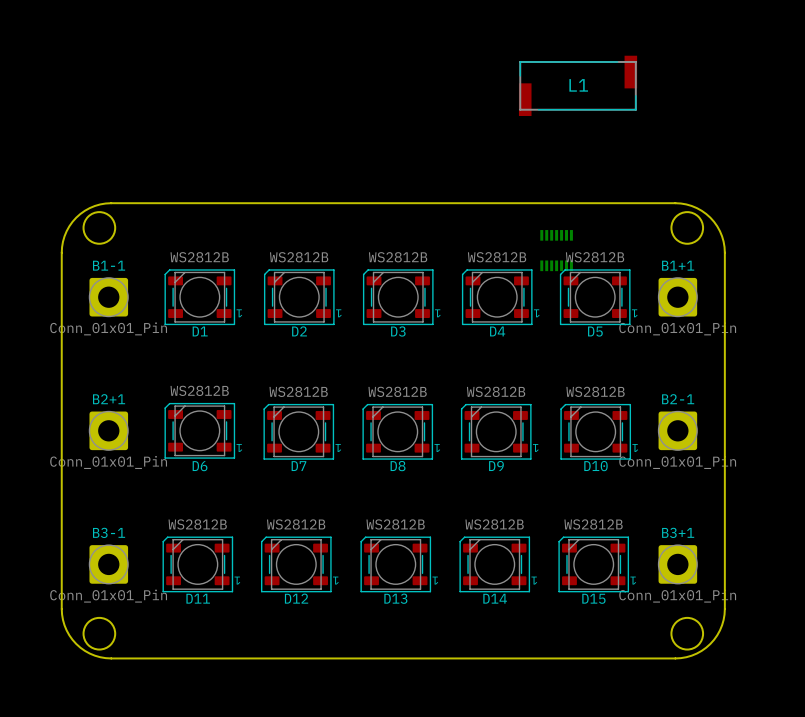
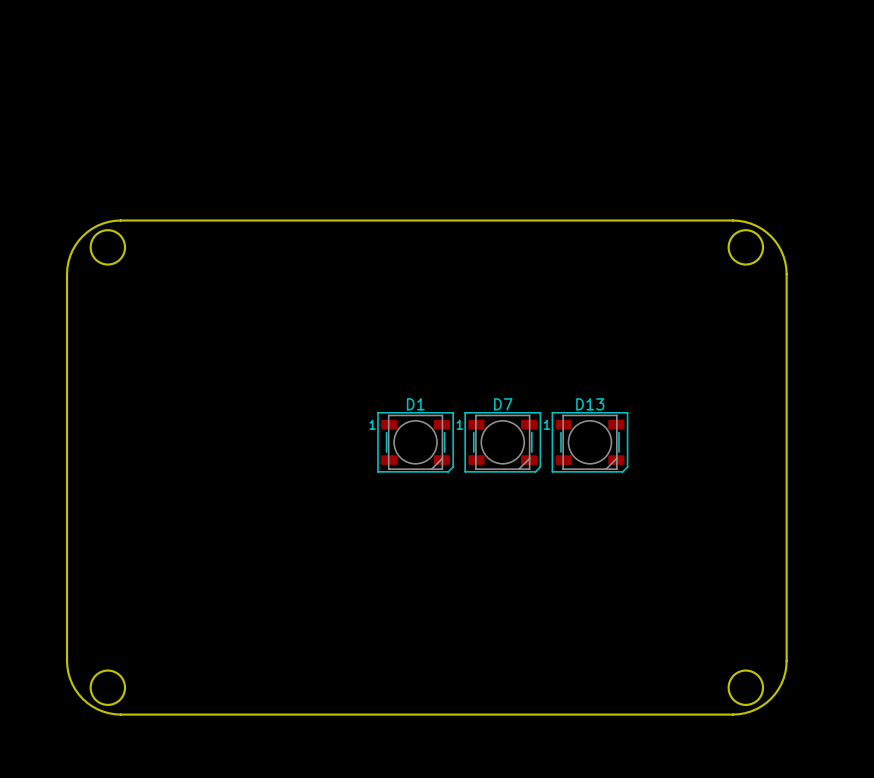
L1: (578, 85) -> none
part: (556, 250) -> none
D1 value: WS2812B (199, 257) -> none
B1-1: Conn_01x01_Pin (108, 297) -> none
D1 rotation: 0° (199, 297) -> 180° (415, 442)
D1 position: (199, 297) -> (415, 442)
D2: WS2812B (299, 297) -> none
D3: WS2812B (398, 297) -> none
D4: WS2812B (497, 297) -> none
D5: WS2812B (595, 297) -> none
B1+1: Conn_01x01_Pin (677, 297) -> none
D7 value: WS2812B (298, 391) -> none
B2+1: Conn_01x01_Pin (108, 430) -> none
D6: WS2812B (199, 430) -> none
B2-1: Conn_01x01_Pin (677, 430) -> none
D7 rotation: 0° (298, 431) -> 180° (502, 442)
D7 position: (298, 431) -> (502, 442)
D8: WS2812B (397, 431) -> none
D9: WS2812B (496, 431) -> none
D10: WS2812B (595, 431) -> none
D13 value: WS2812B (395, 524) -> none
B3-1: Conn_01x01_Pin (108, 564) -> none
D11: WS2812B (197, 564) -> none
D12: WS2812B (296, 564) -> none
D13 rotation: 0° (395, 564) -> 180° (589, 442)
D13 position: (395, 564) -> (589, 442)
D14: WS2812B (494, 564) -> none
D15: WS2812B (593, 564) -> none
B3+1: Conn_01x01_Pin (677, 564) -> none

